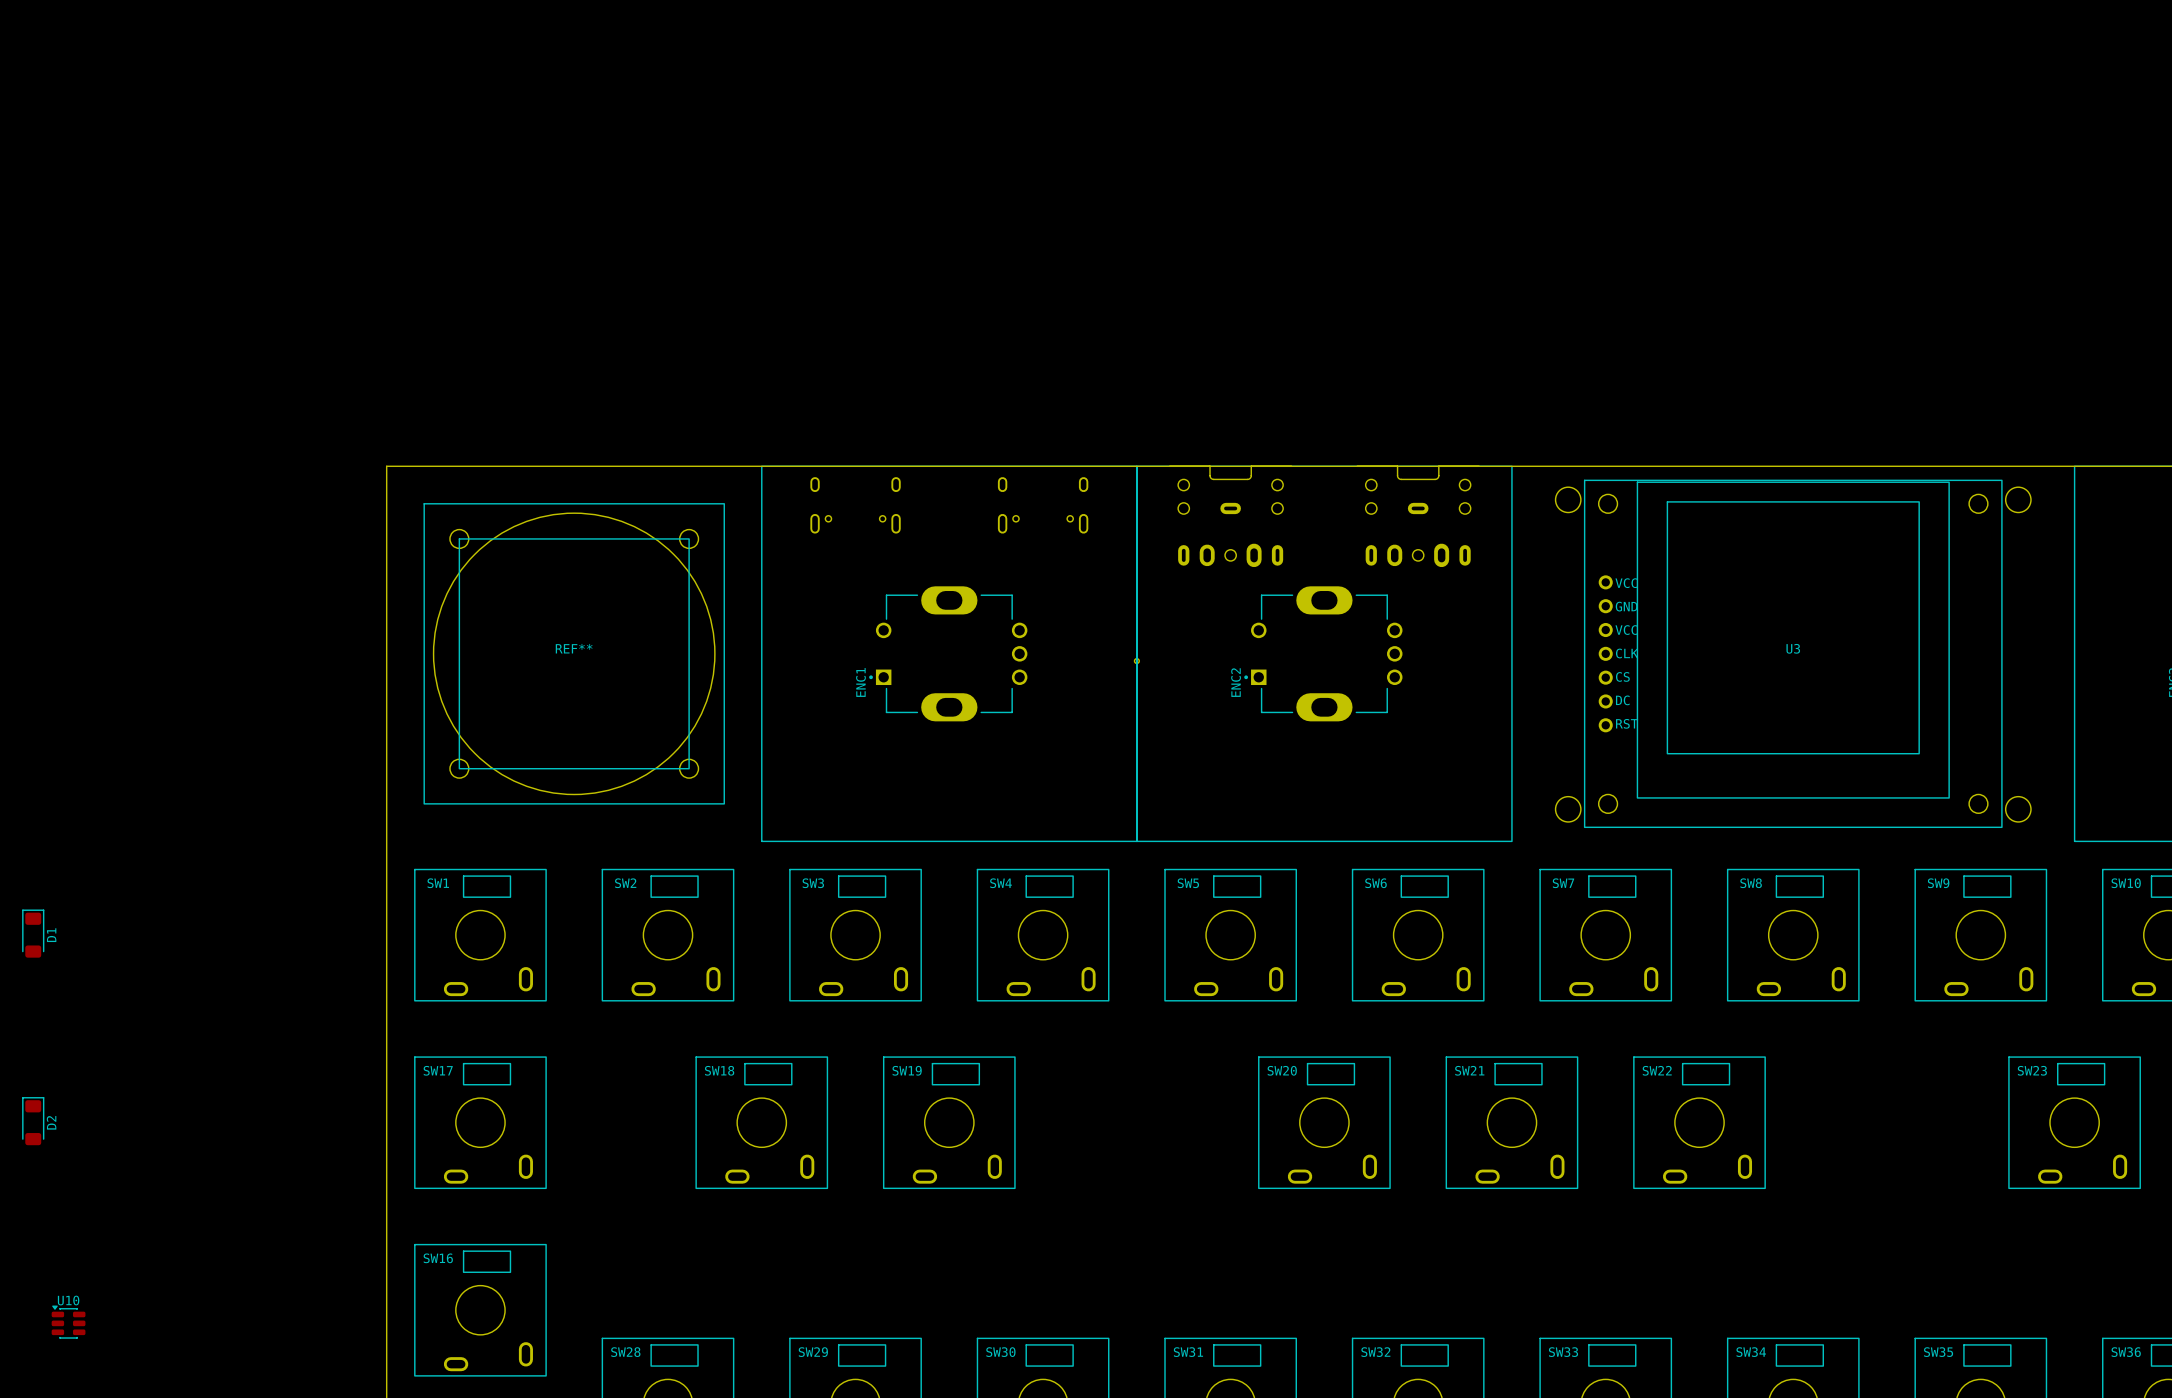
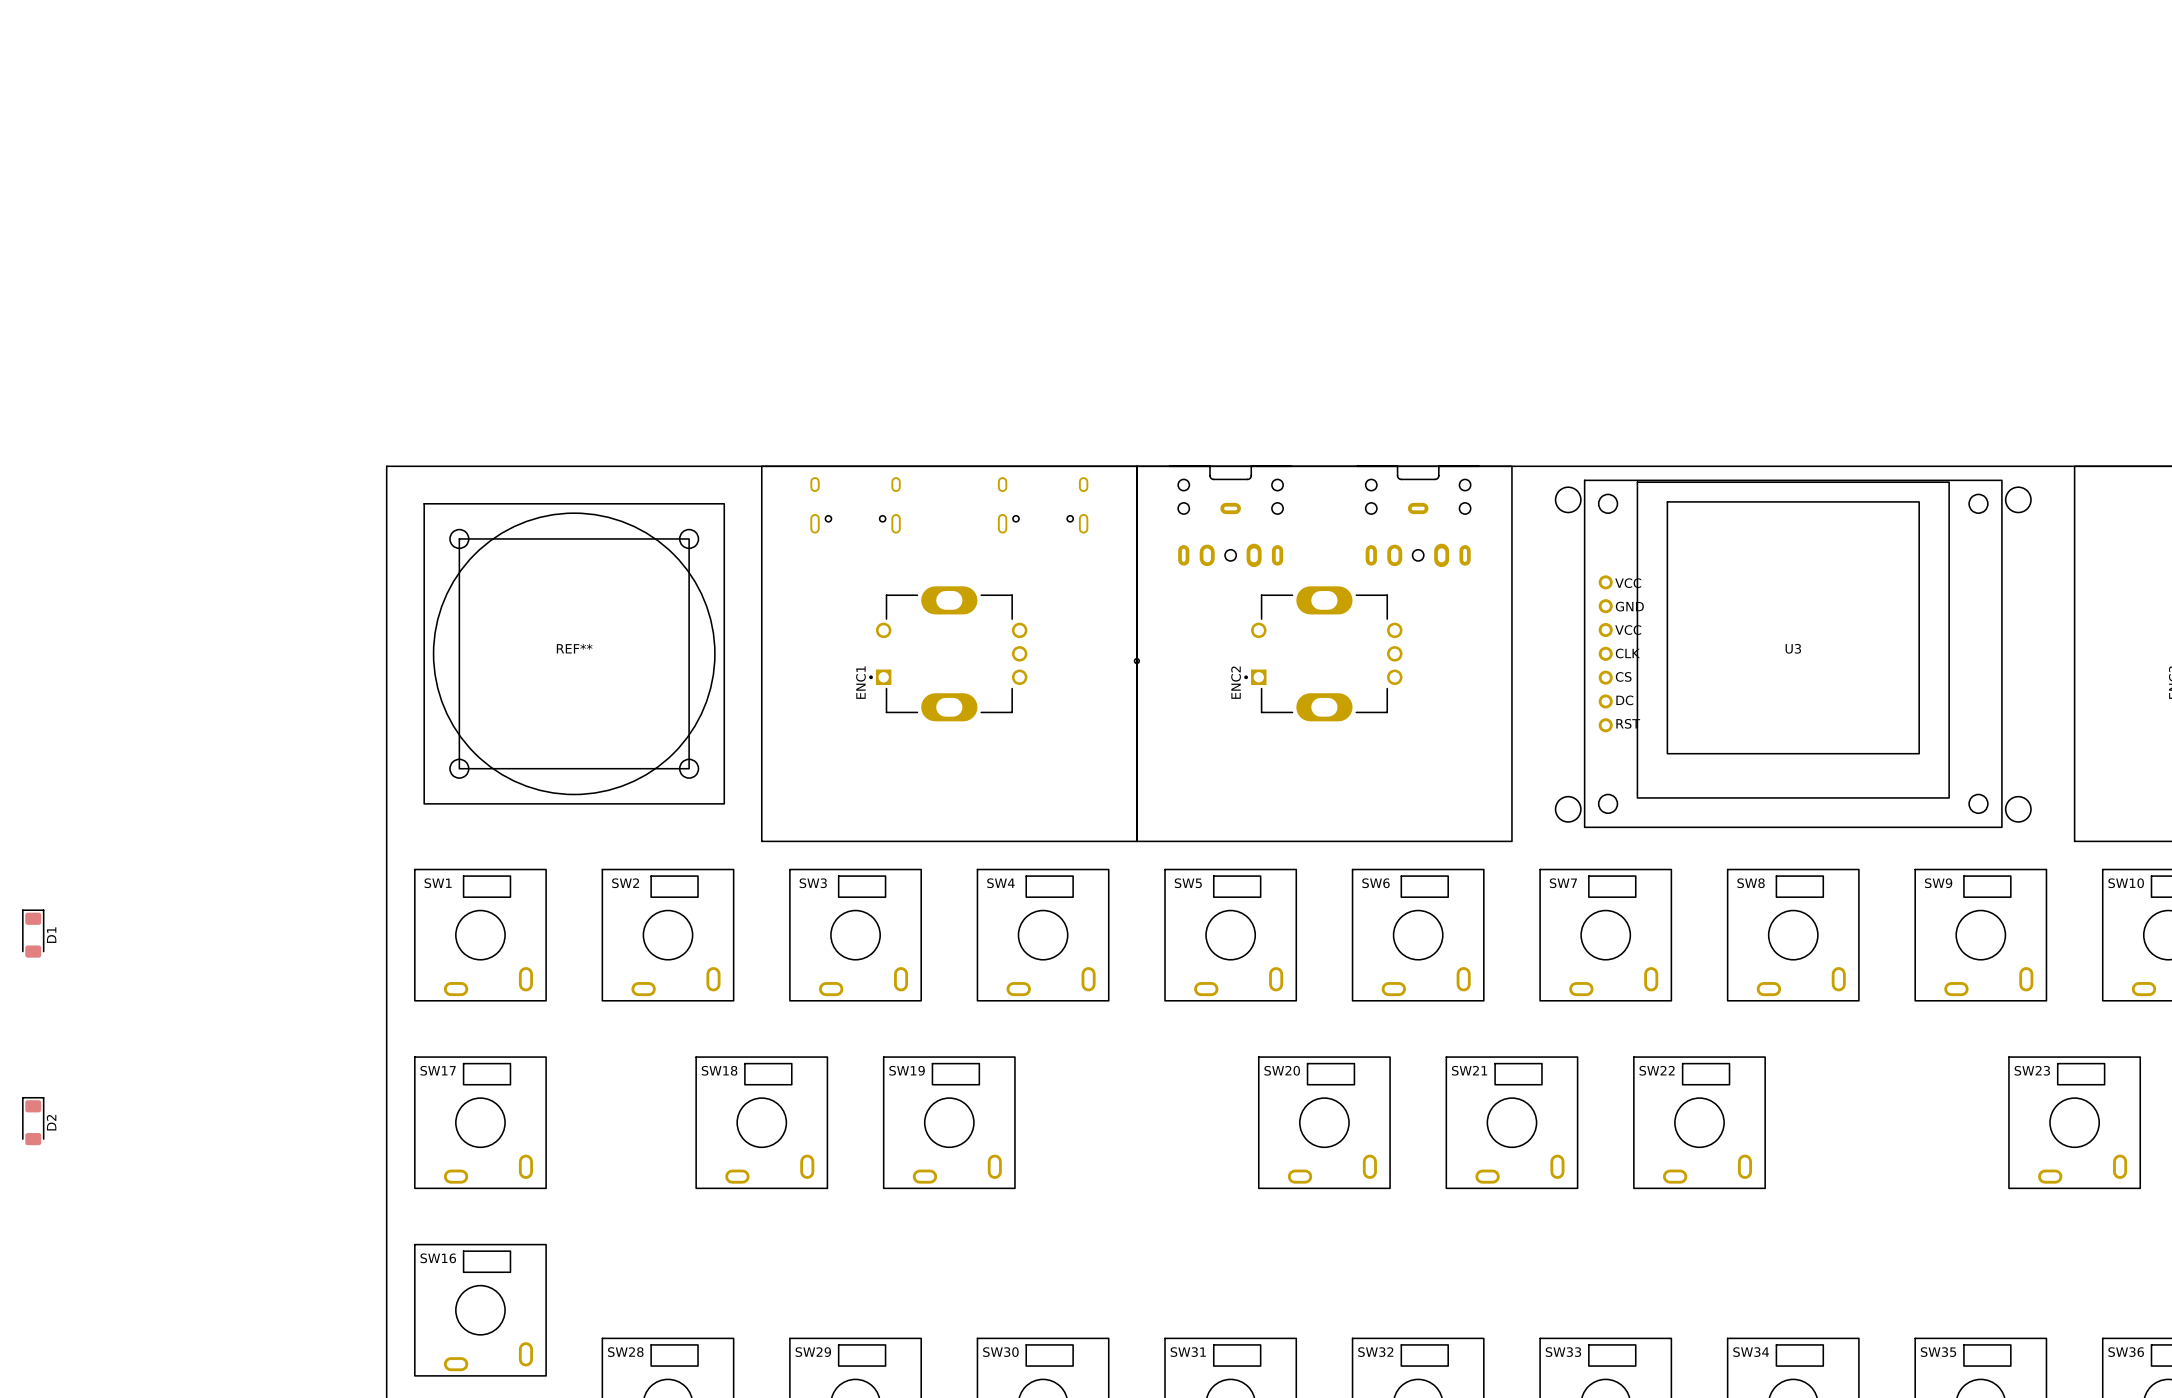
U10: (68, 1322) -> none

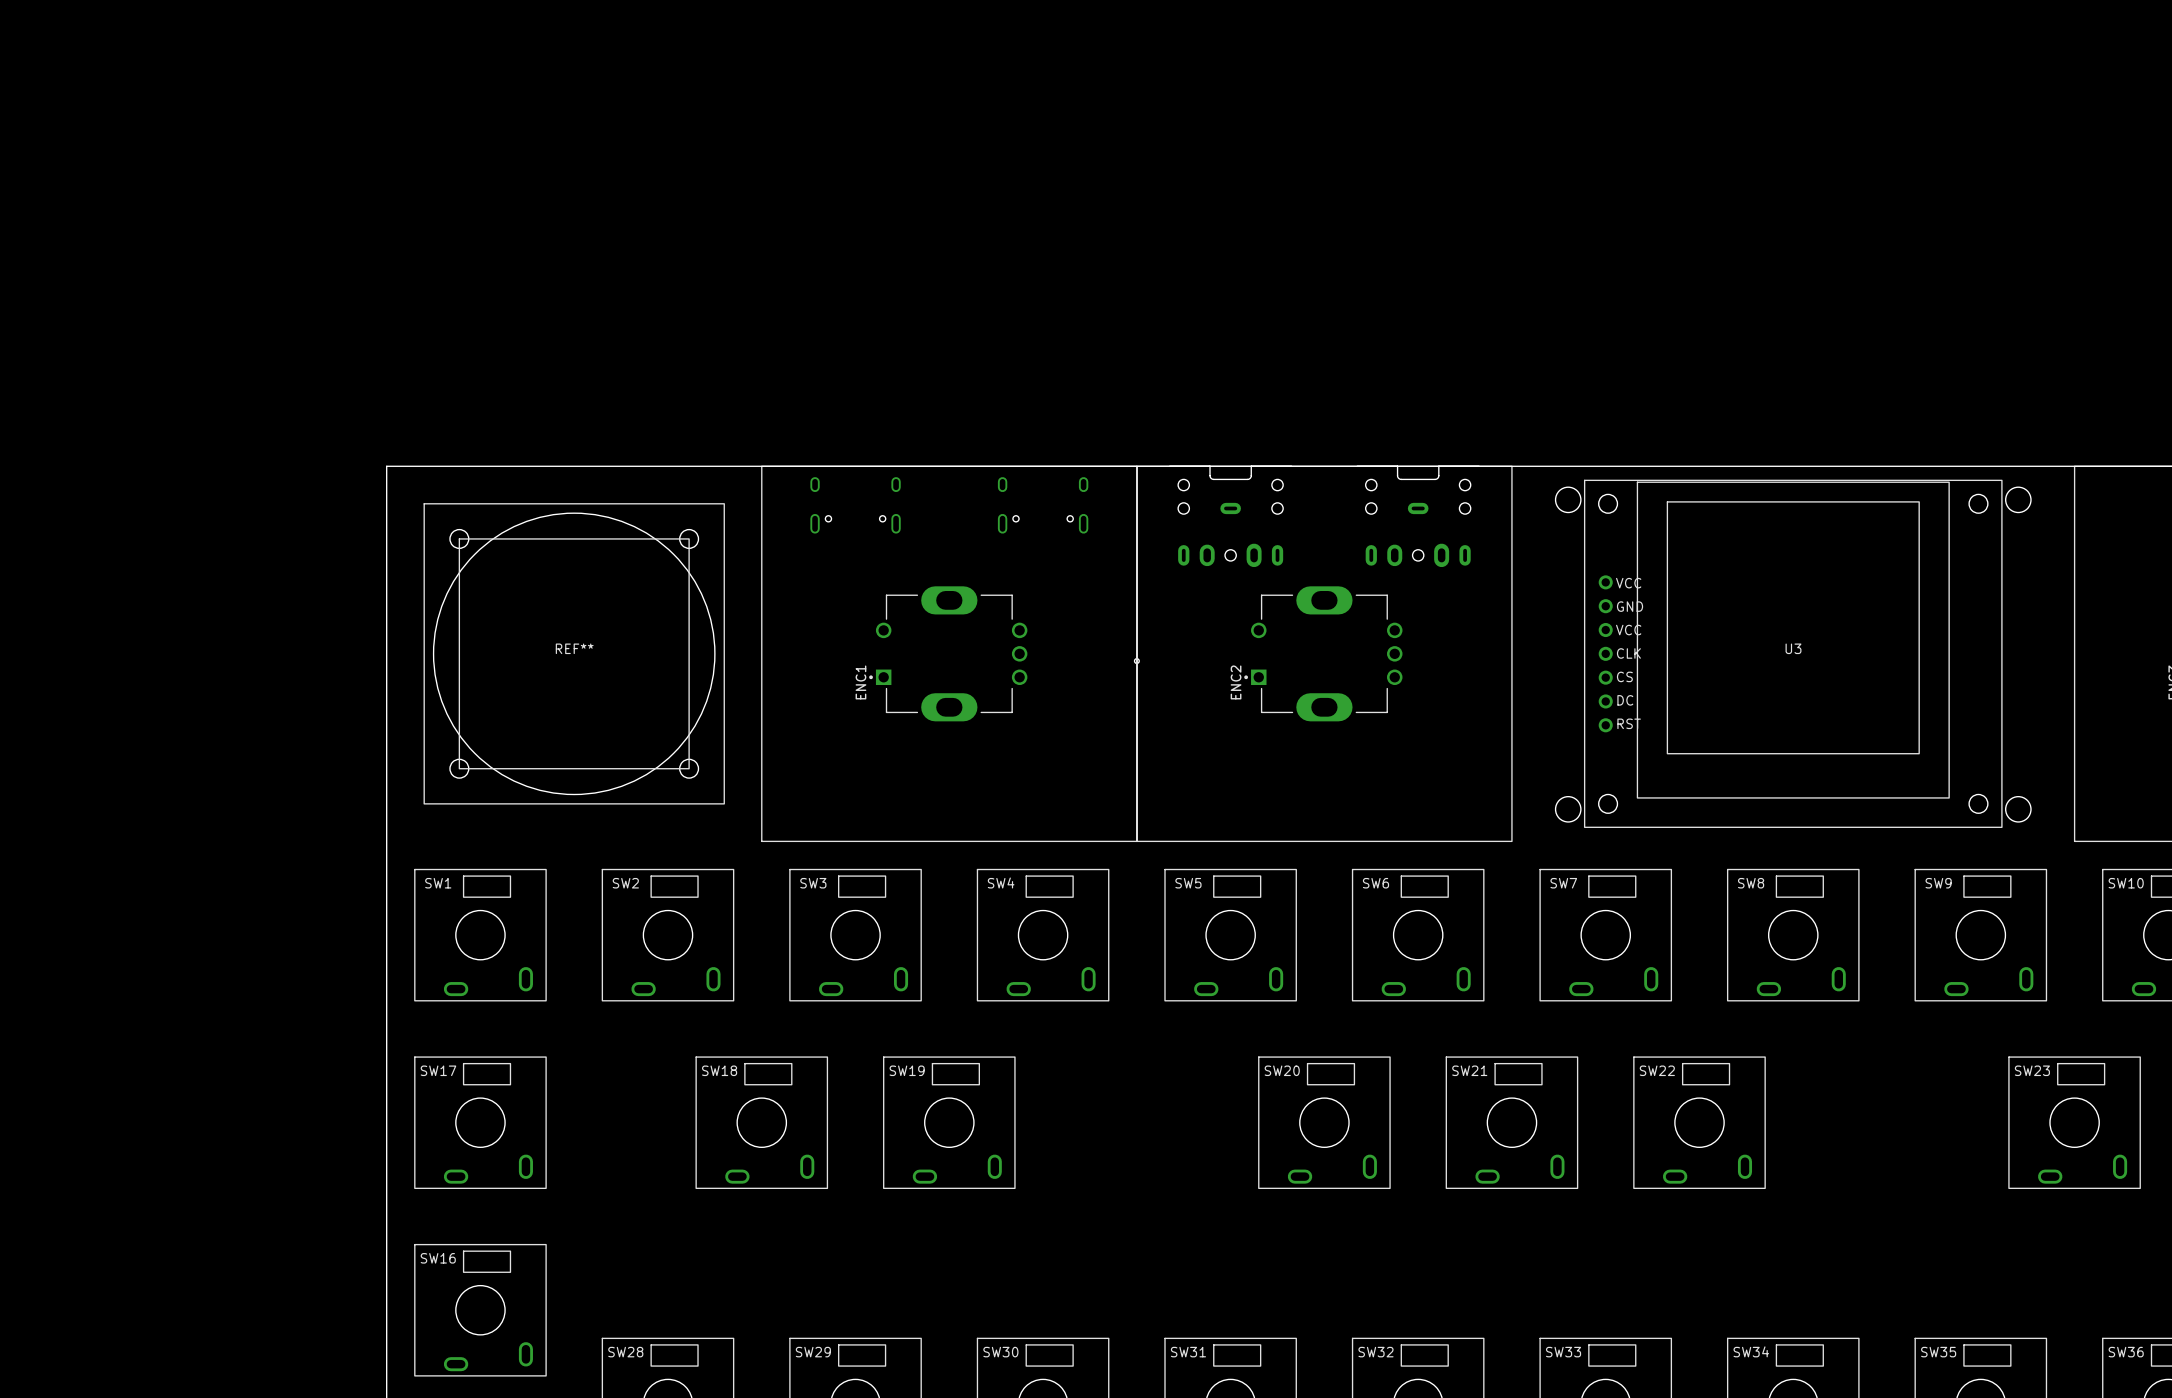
D1: (33, 933) -> none
D2: (33, 1121) -> none

